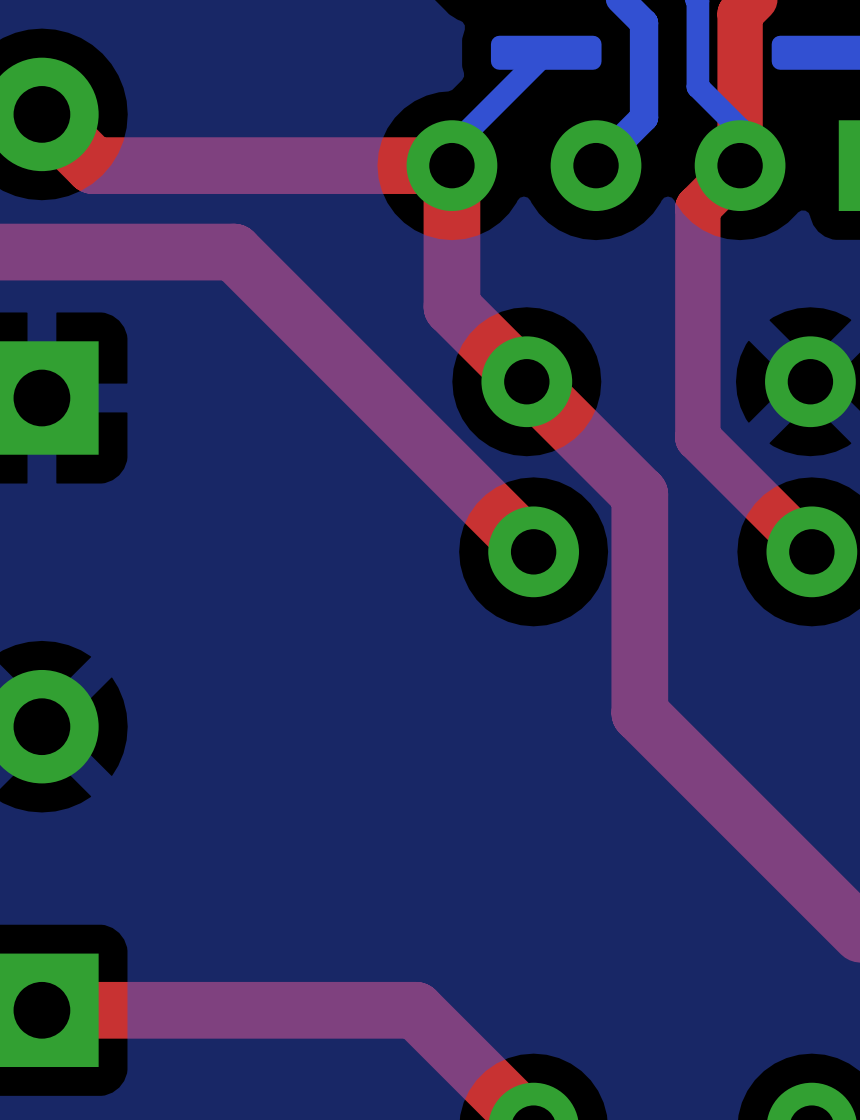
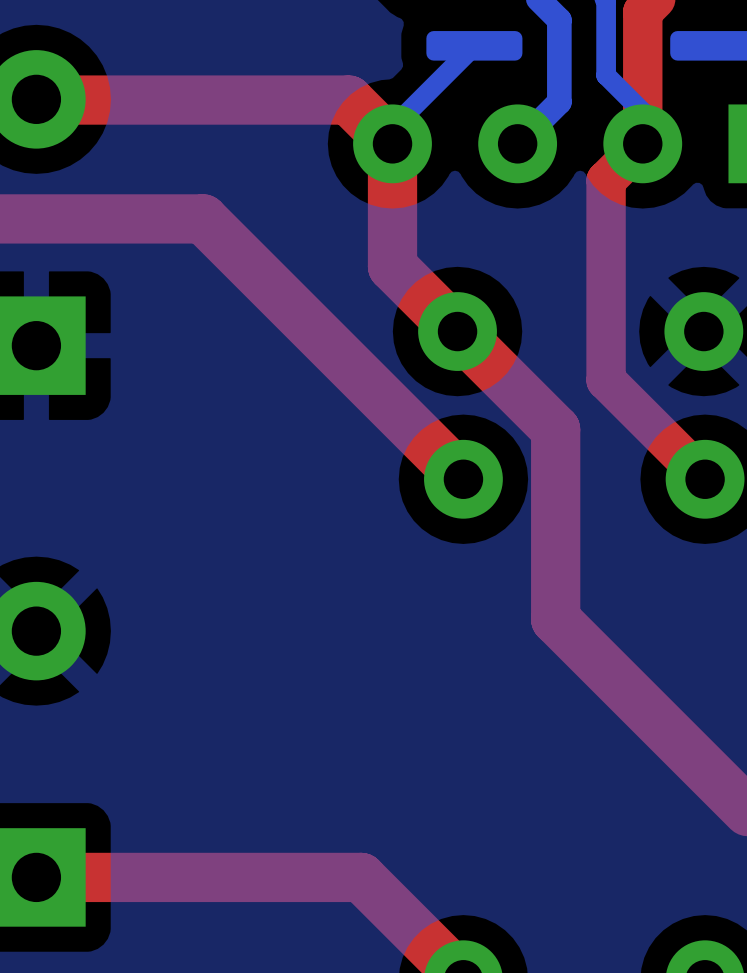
top track: (41, 114) (93, 165) (451, 165) -> (37, 100) (348, 100) (392, 143)

